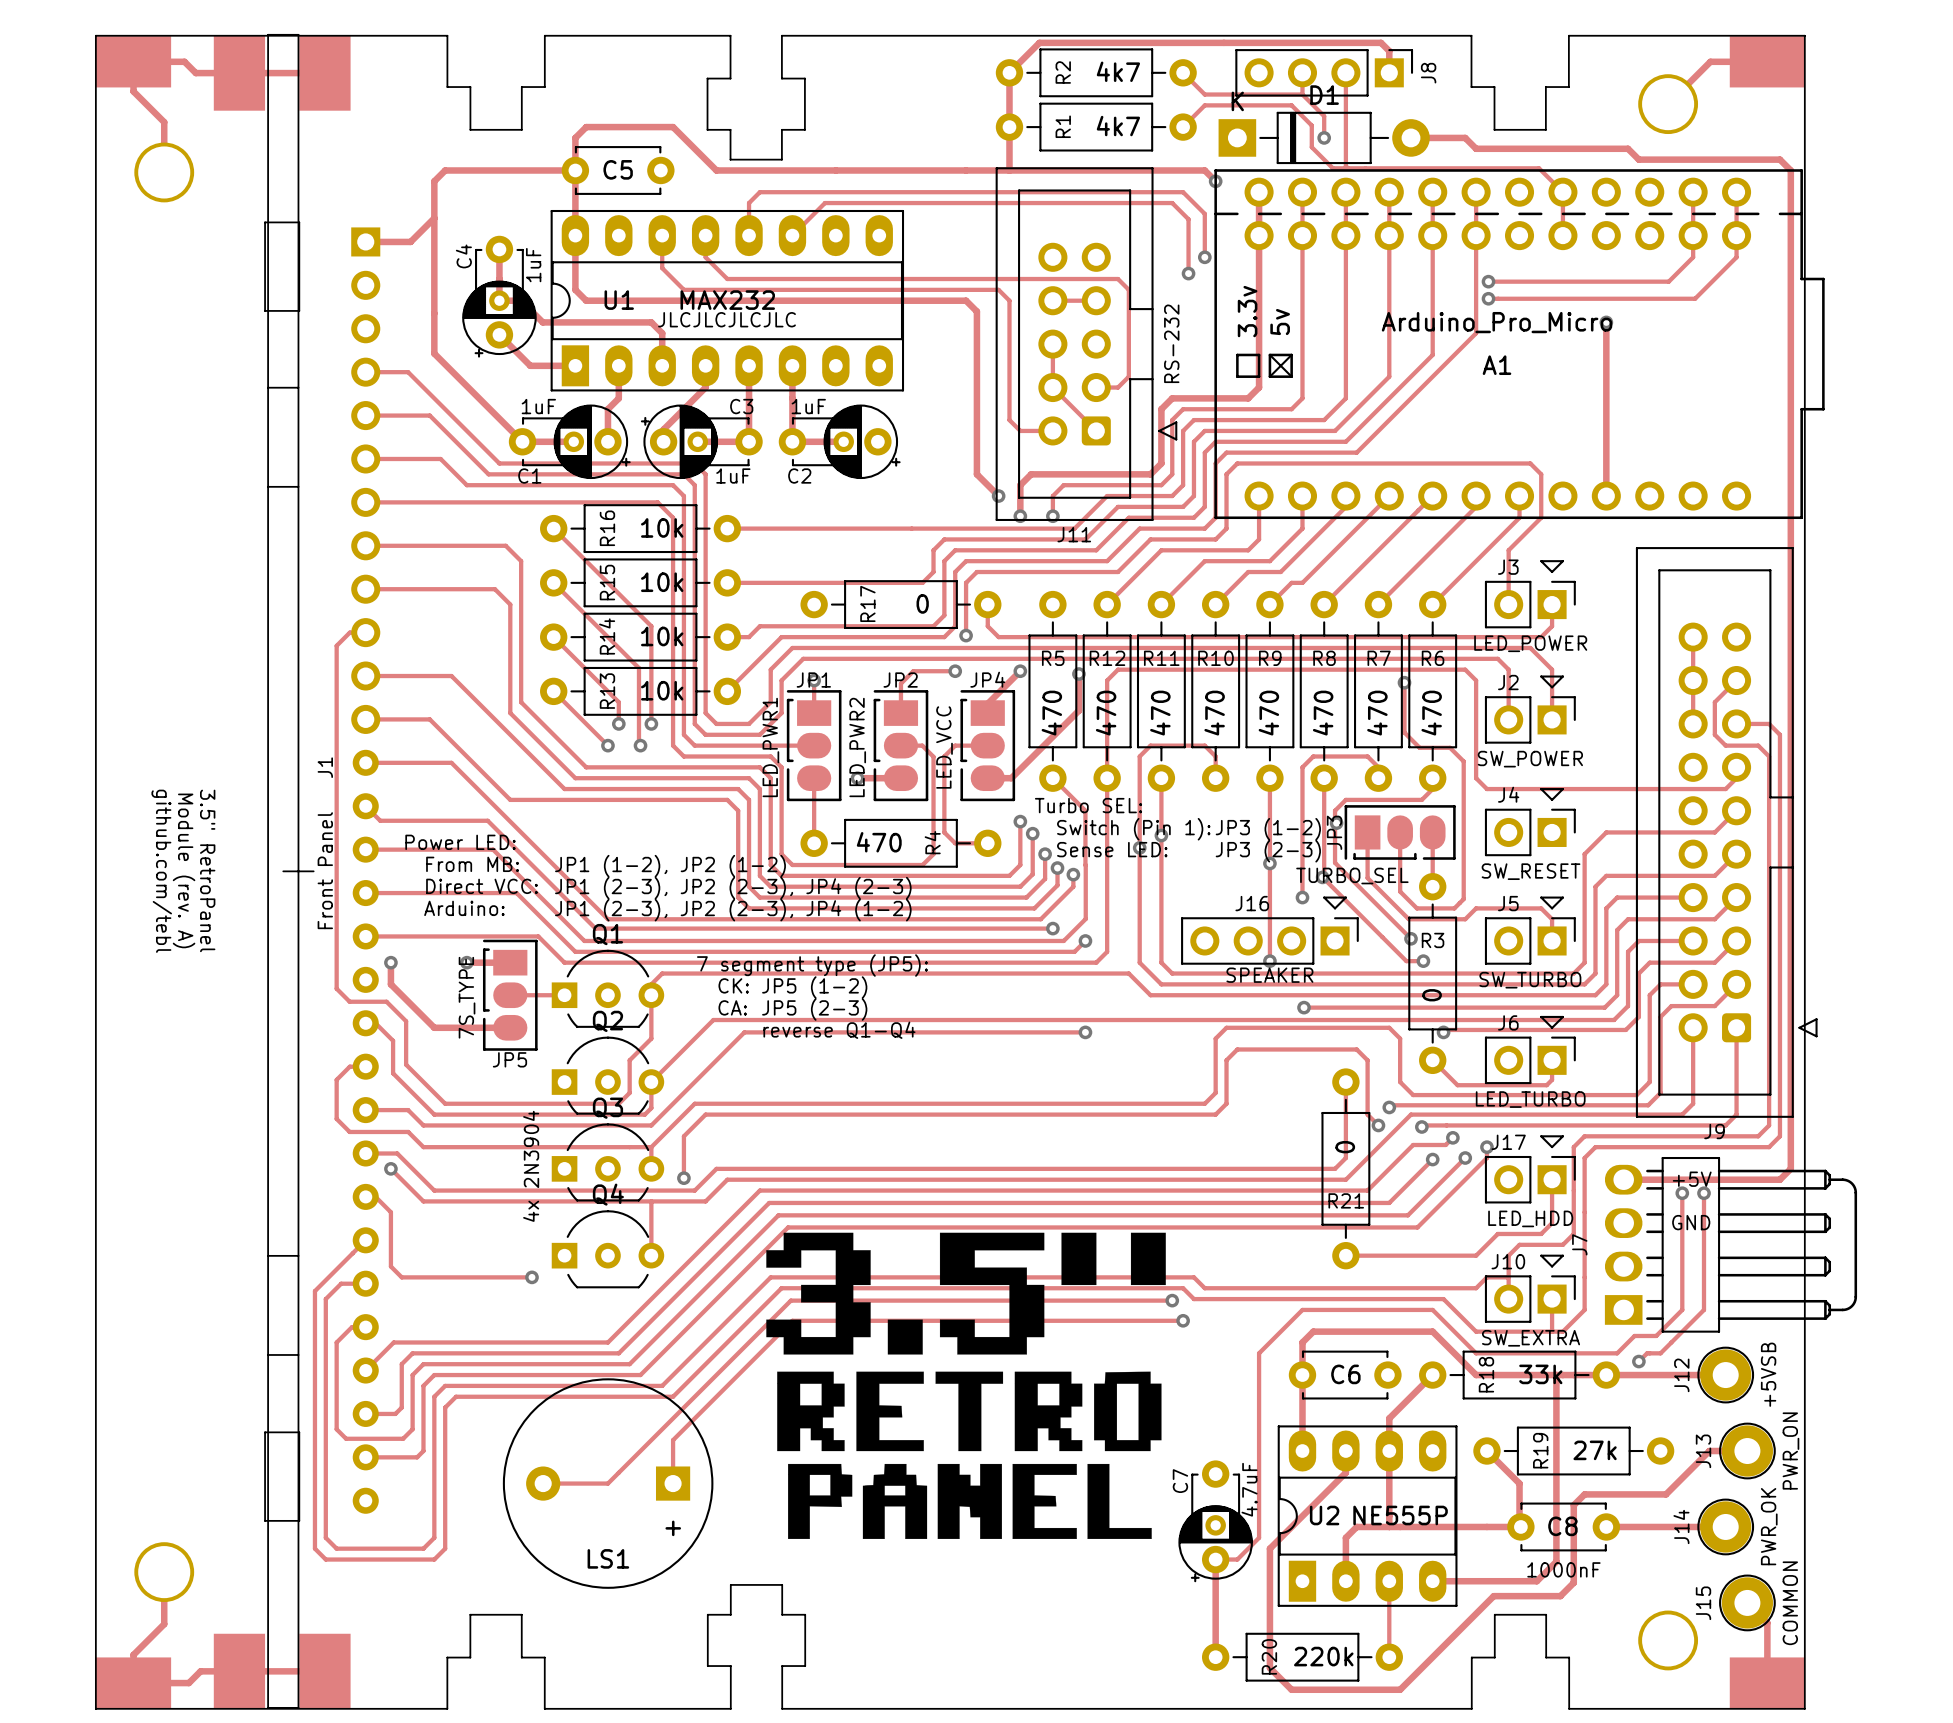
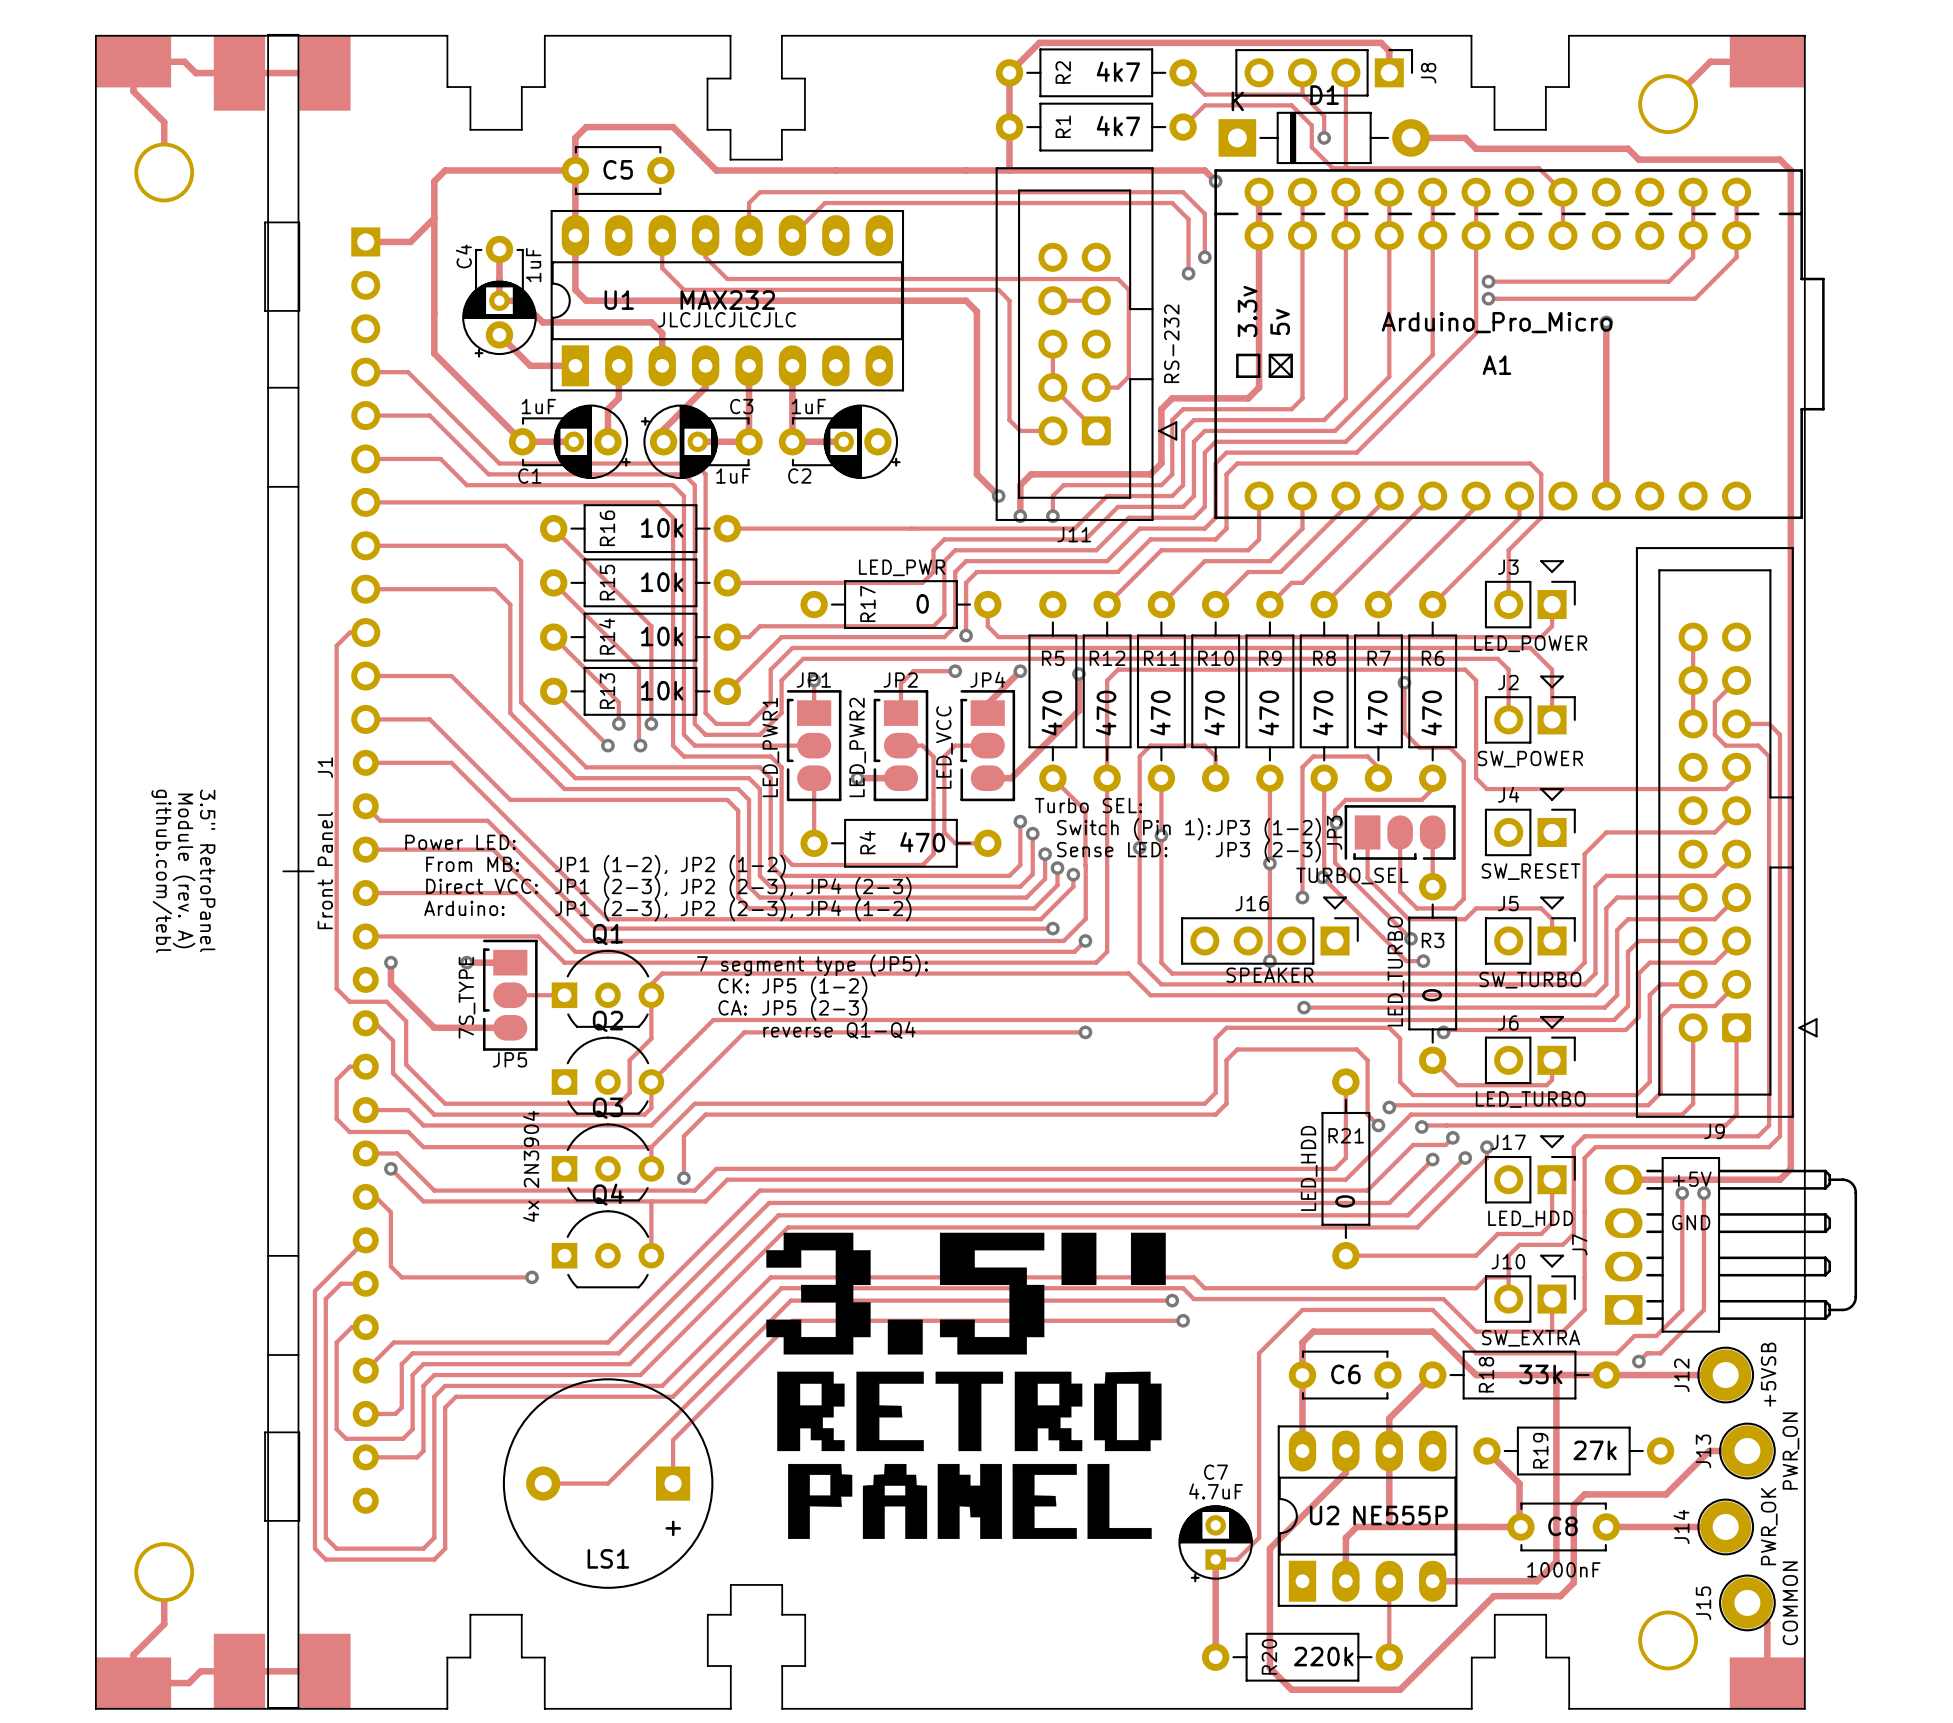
text: none -> LED_PWR (902, 567)
R4 value position: 470 (879, 842) -> 470 (922, 842)
R4 name position: R4 (932, 842) -> R4 (867, 842)
text: none -> LED_TURBO (1395, 971)
R21 value position: 0 (1345, 1147) -> 0 (1345, 1201)
text: none -> LED_HDD (1309, 1168)
R21 name position: R21 (1346, 1200) -> R21 (1346, 1135)
C7 footprint: [1178, 1460, 1253, 1583] -> [1178, 1505, 1253, 1583]
C7 name position: C7 (1180, 1481) -> C7 (1215, 1472)
C7 value position: 4.7uF (1249, 1489) -> 4.7uF (1215, 1491)

